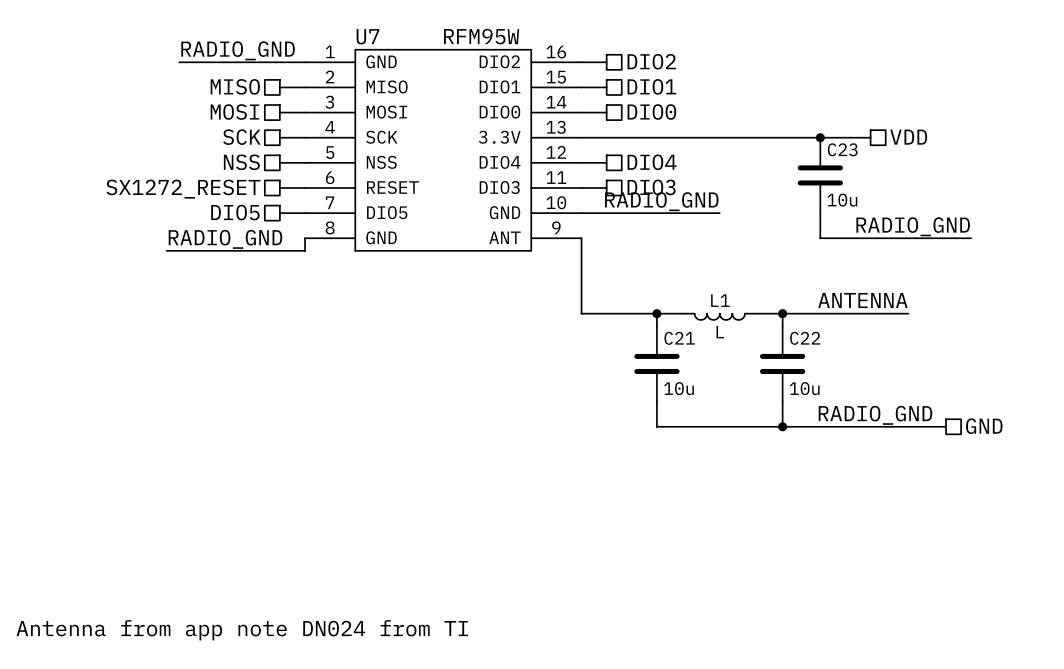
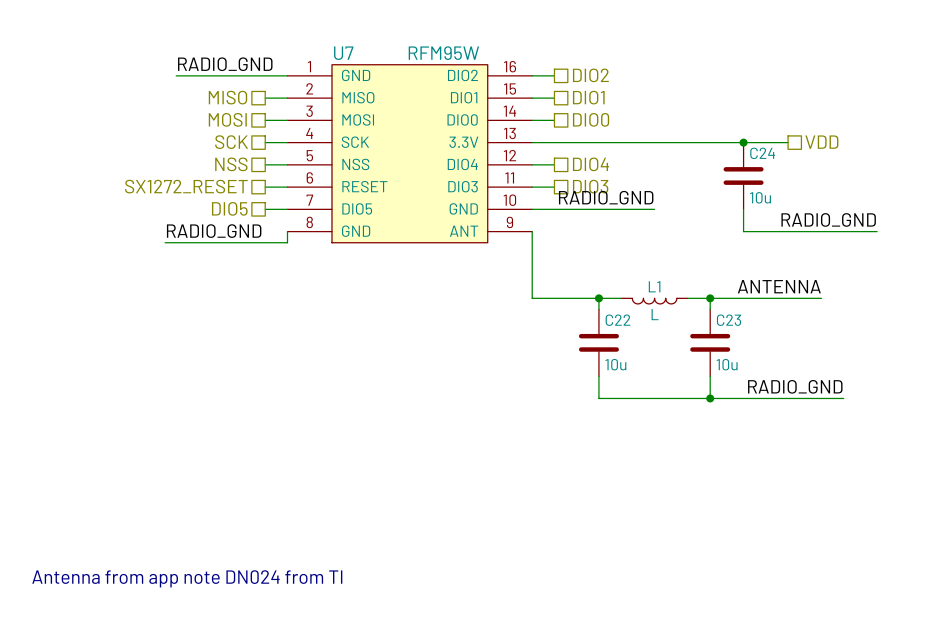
C23 name: C23 (842, 149) -> C24 (762, 153)
C21 name: C21 (679, 338) -> C22 (617, 320)
C22 name: C22 (805, 338) -> C23 (728, 320)
wire: (933, 426) (946, 426) -> none
hierarchical label: GND (984, 426) -> none

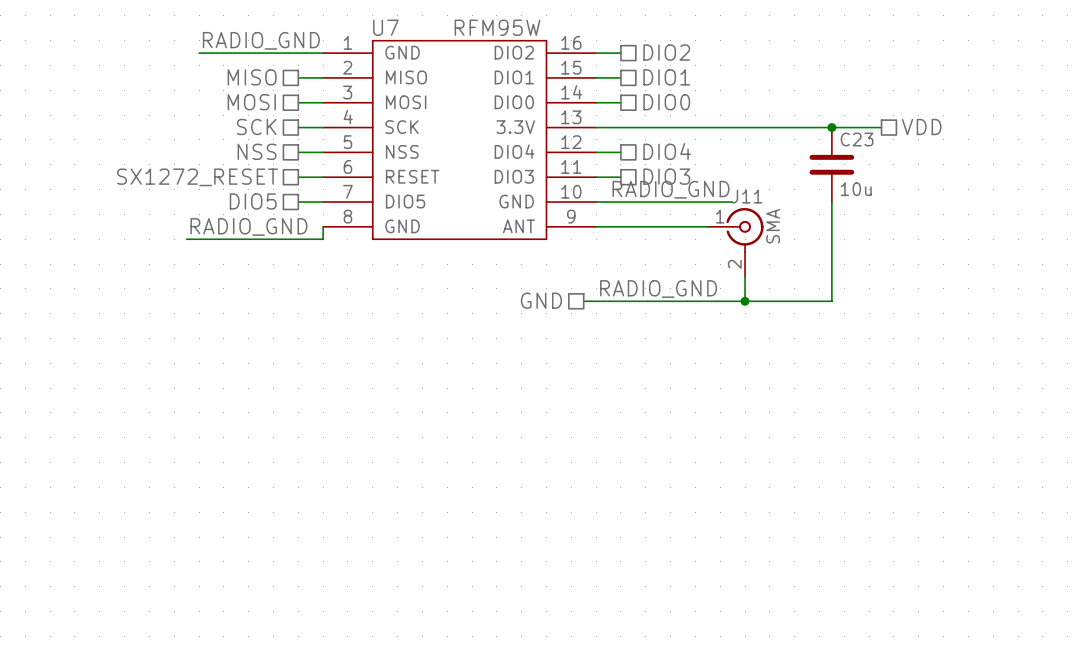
C24 name: C24 (762, 153) -> C23 (857, 139)
label: RADIO_GND (828, 219) -> none
wire: (532, 231) (532, 298) -> (583, 301) (596, 301)
wire: none -> (596, 226) (707, 226)
wire: (743, 231) (877, 231) -> none
J11: none -> SMA (735, 242)
label: none -> RADIO_GND (658, 289)
label: ANTENNA (779, 286) -> none
hierarchical label: none -> GND (541, 300)
wire: (598, 298) (598, 309) -> none
junction: (598, 298) -> none
wire: none -> (695, 301) (769, 301)
junction: none -> (745, 301)
wire: (710, 298) (710, 309) -> none
junction: (710, 298) -> none
wire: (743, 298) (821, 298) -> (831, 301) (831, 226)
L1: L (654, 301) -> none
C22: 10u (598, 342) -> none
C23: 10u (710, 342) -> none
wire: (598, 376) (598, 398) (843, 398) -> none
wire: (710, 376) (710, 398) -> (745, 276) (745, 301)
label: RADIO_GND (795, 386) -> none
junction: (710, 398) -> none
text: Antenna from app note DN024 from TI (187, 578) -> none

